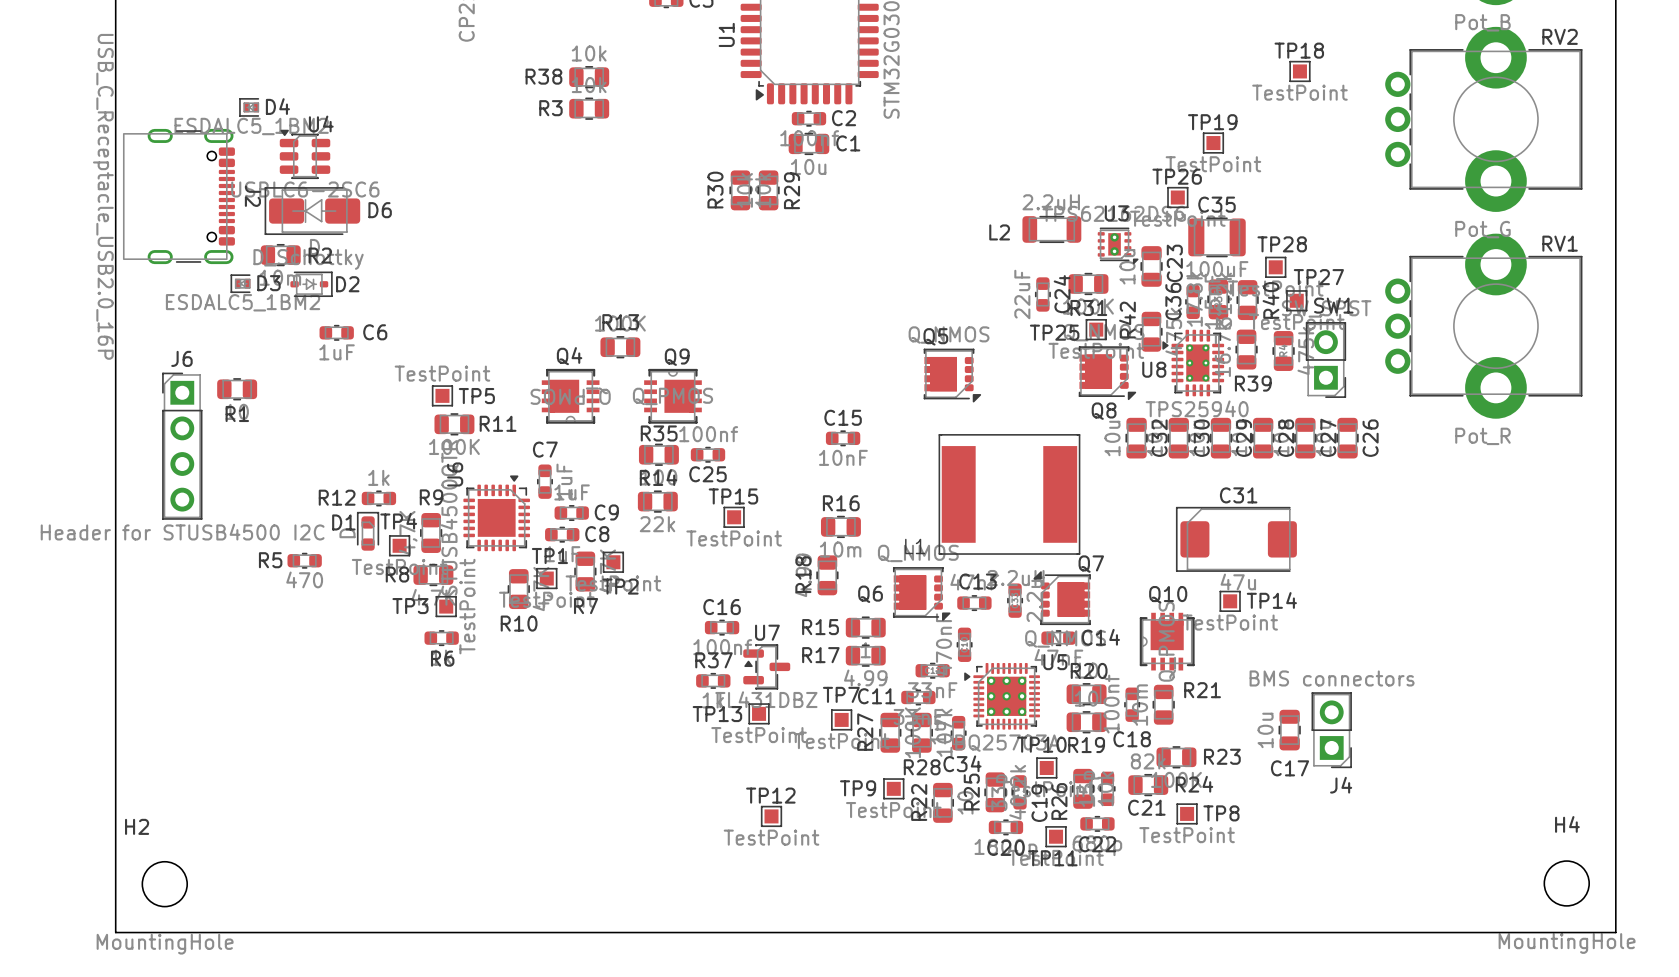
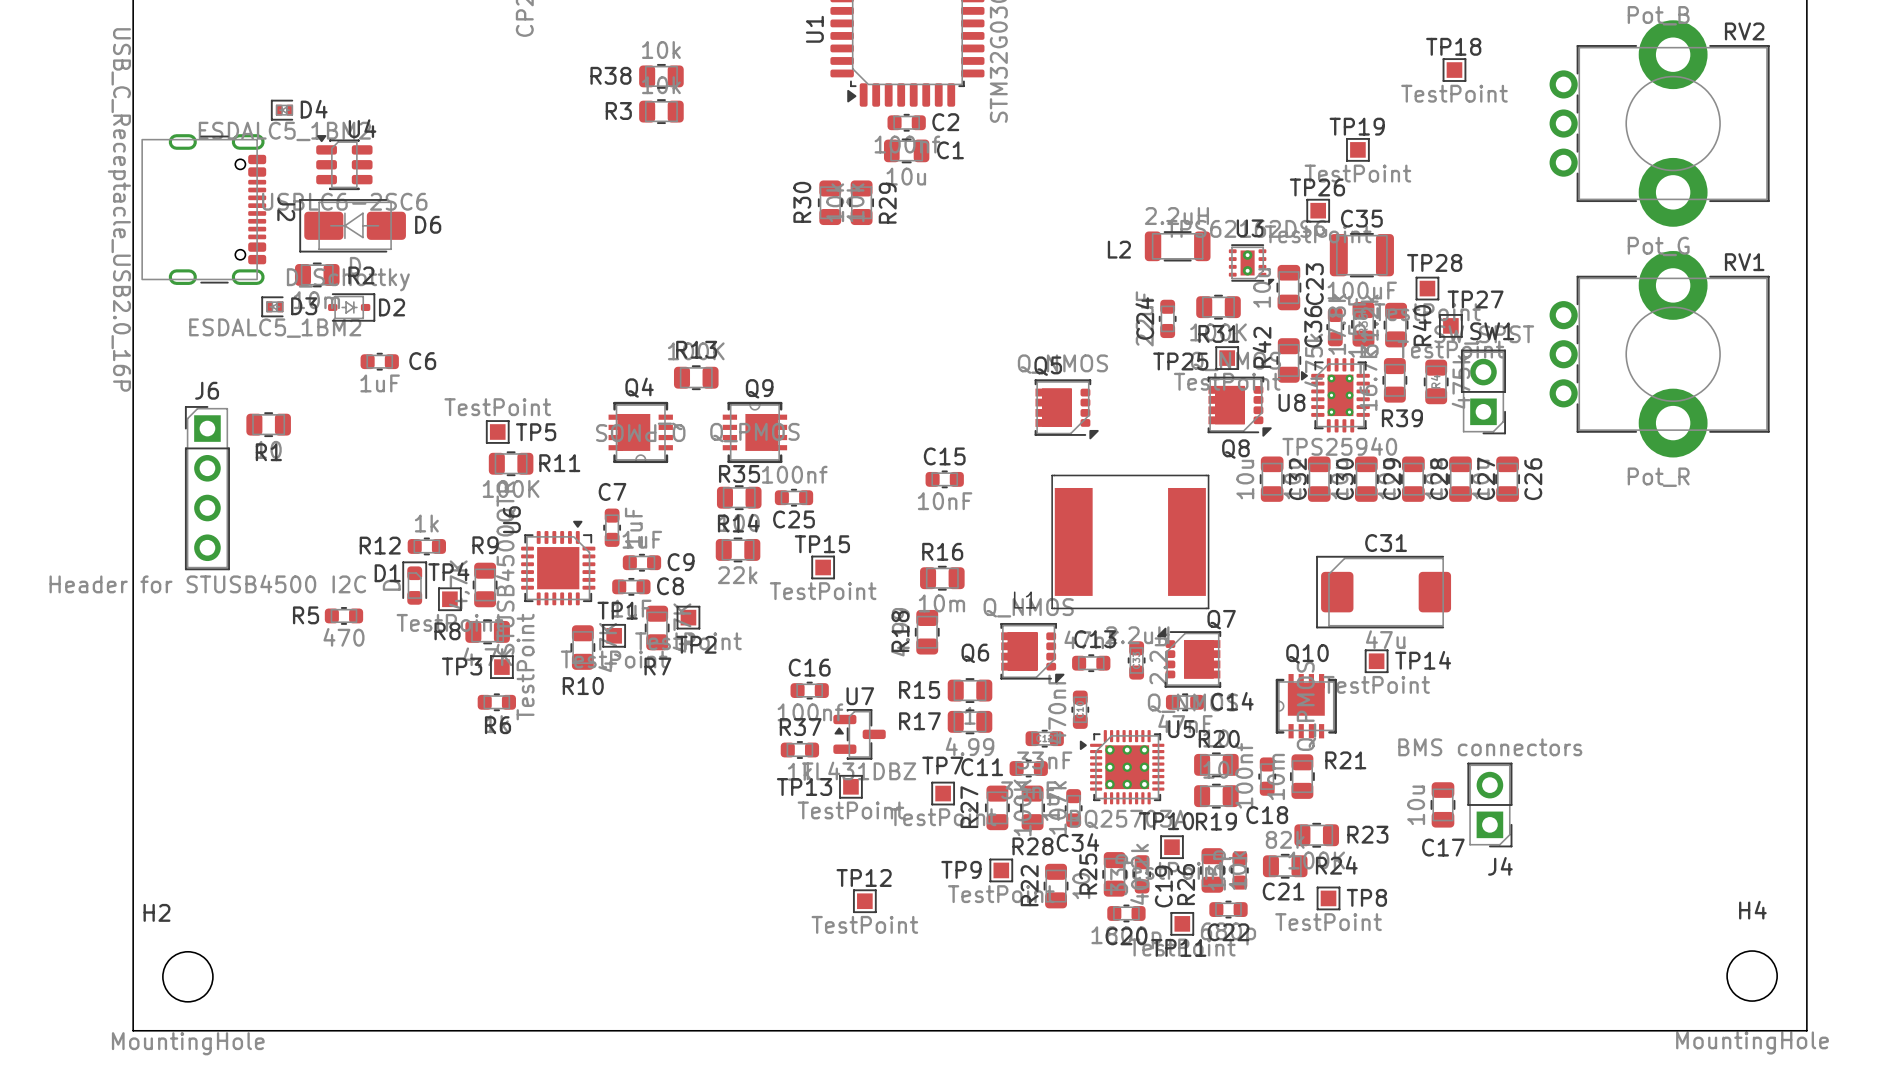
C24 name position: C24 (1062, 294) -> C24 (1144, 318)

